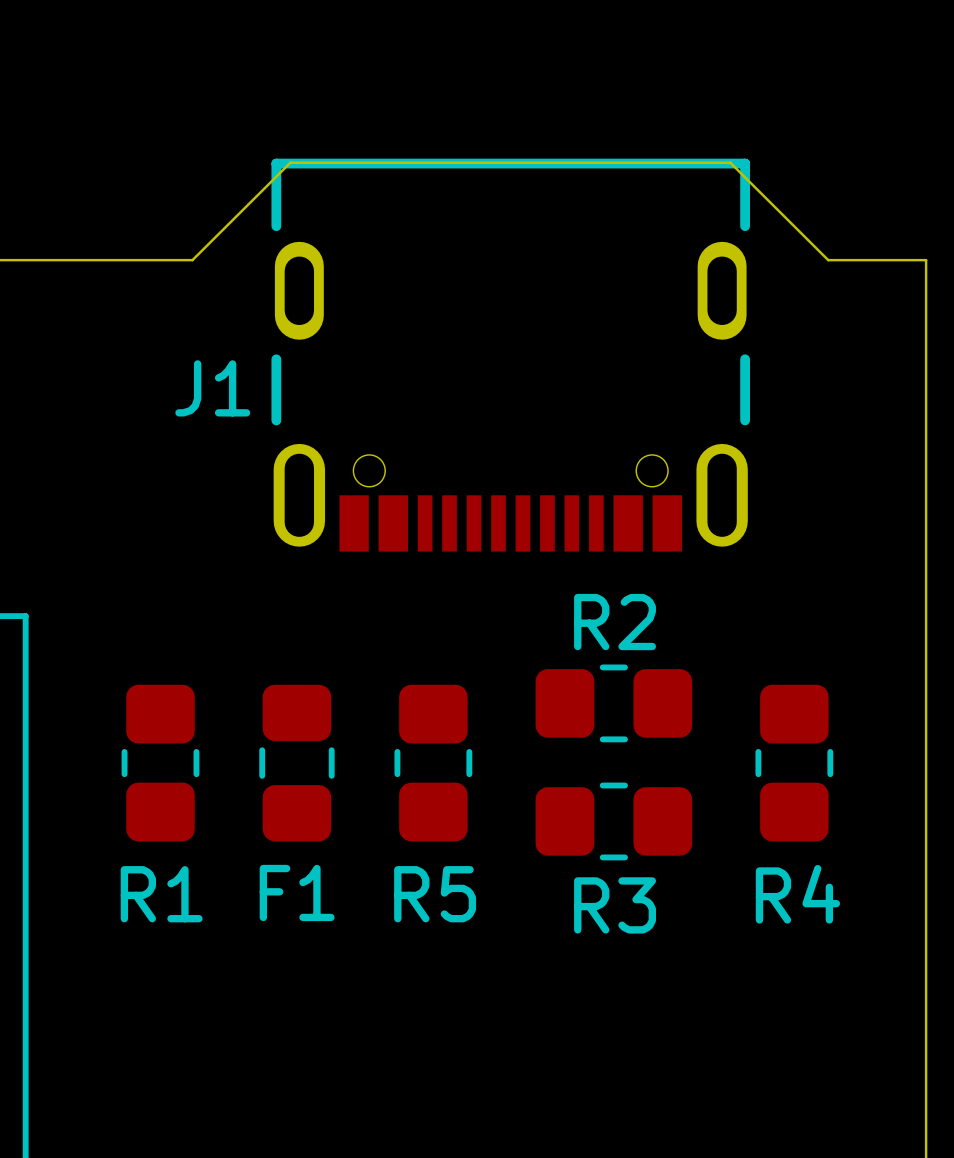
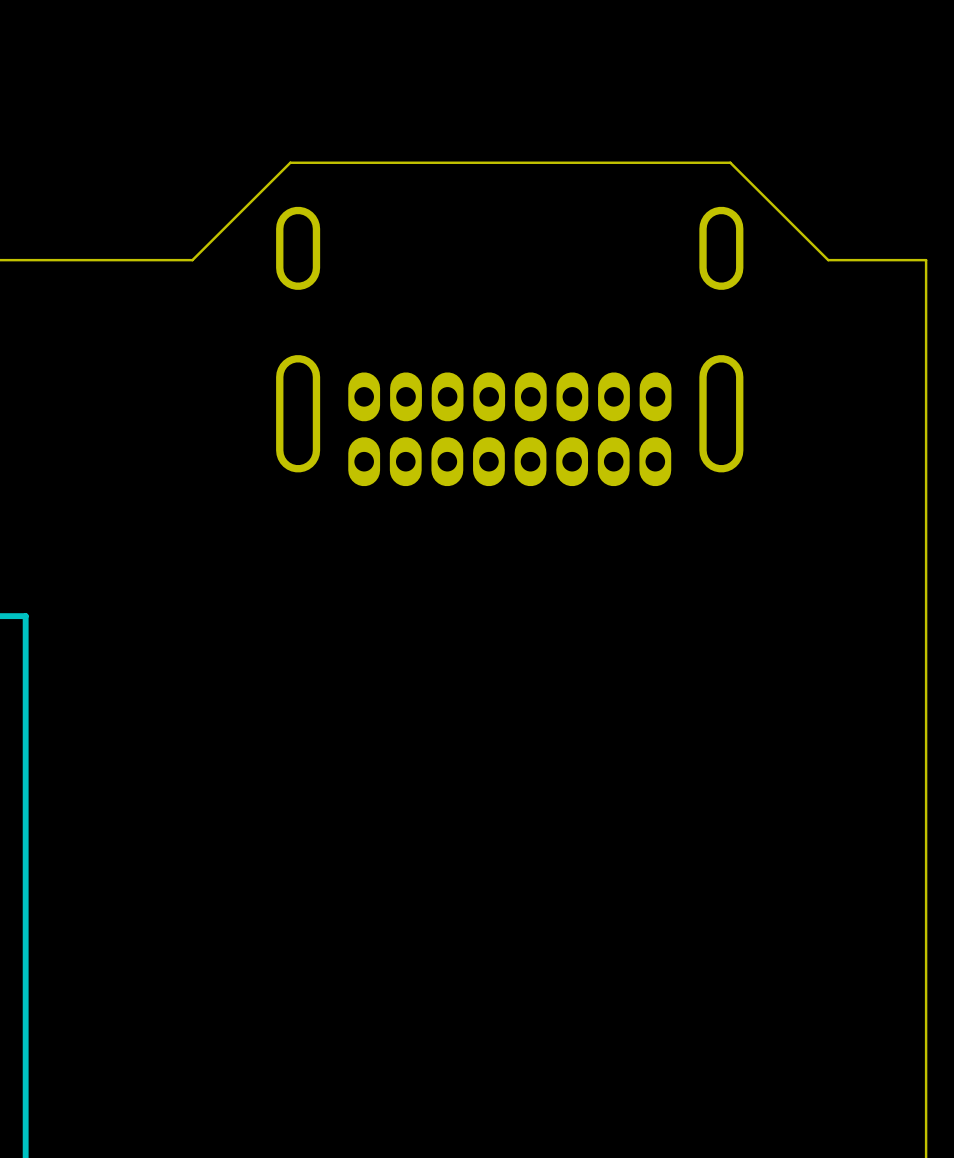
part: none -> (509, 346)
J1: (510, 355) -> none
R2: (613, 703) -> none
R1: (160, 763) -> none
F1: (296, 763) -> none
R5: (433, 763) -> none
R4: (794, 763) -> none
R3: (613, 821) -> none

